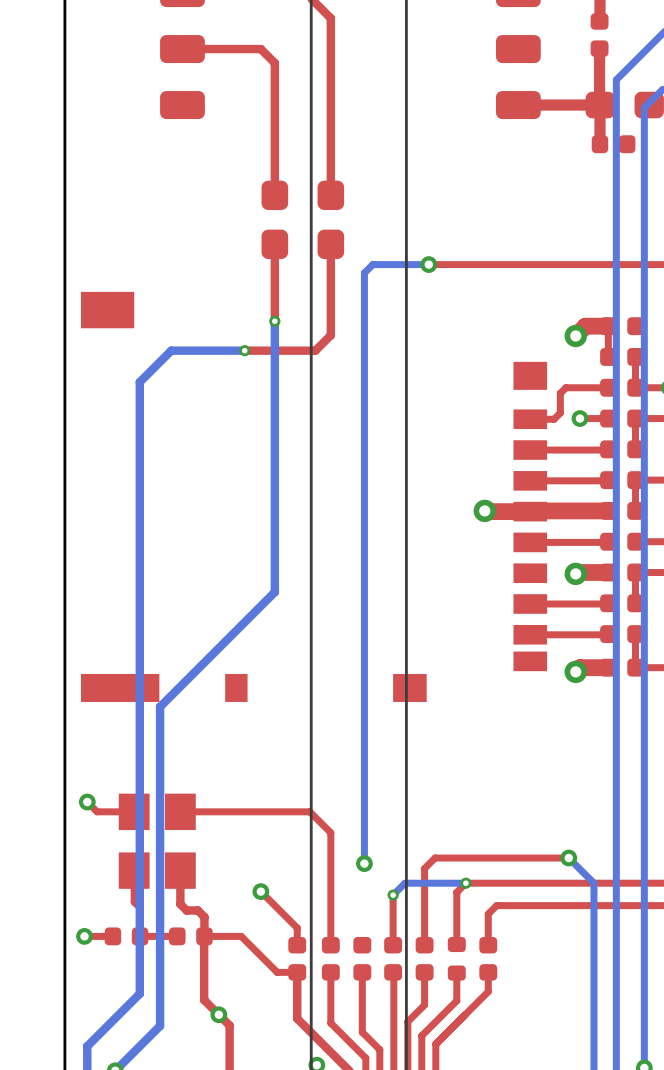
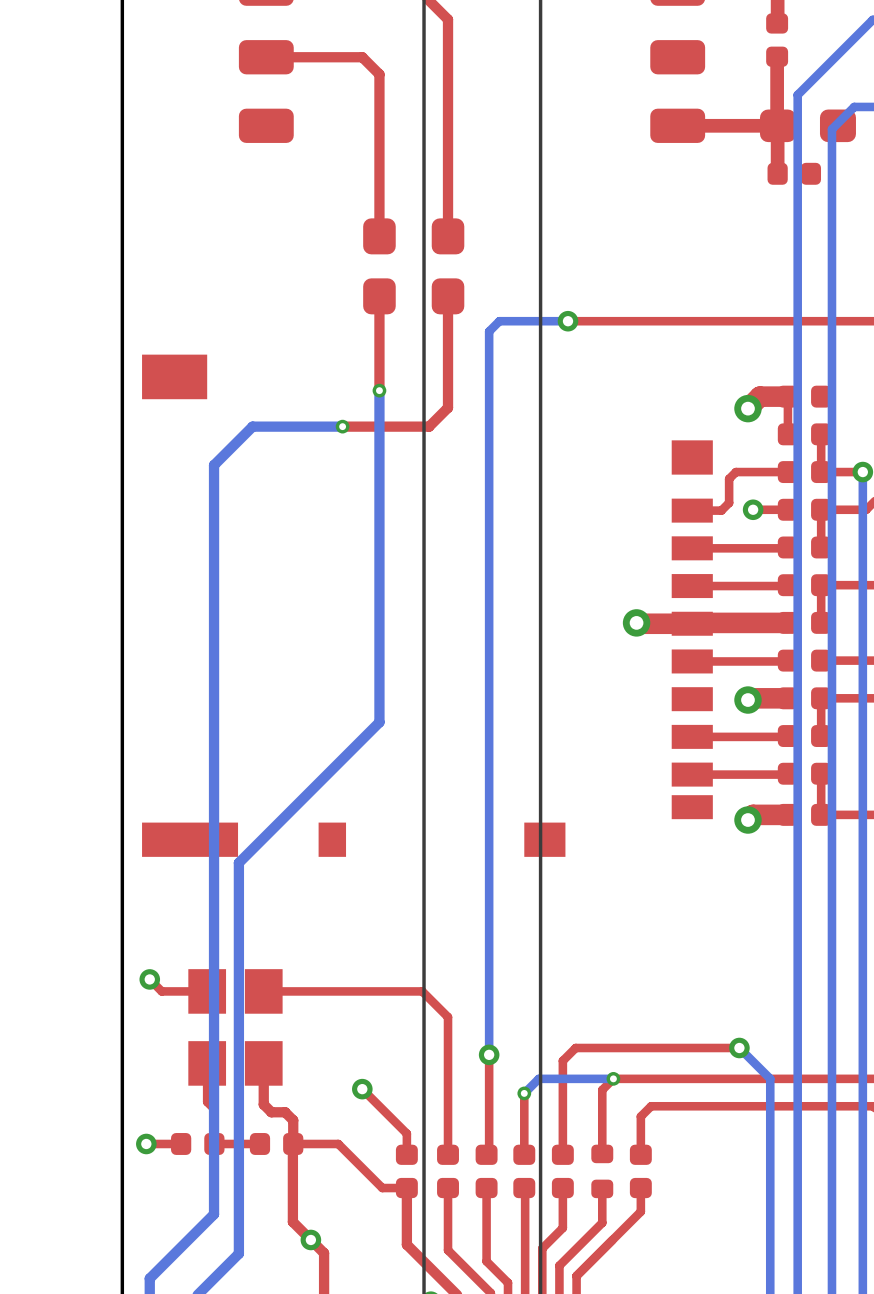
top track: none -> (489, 1054) (489, 1152) (486, 1154)

